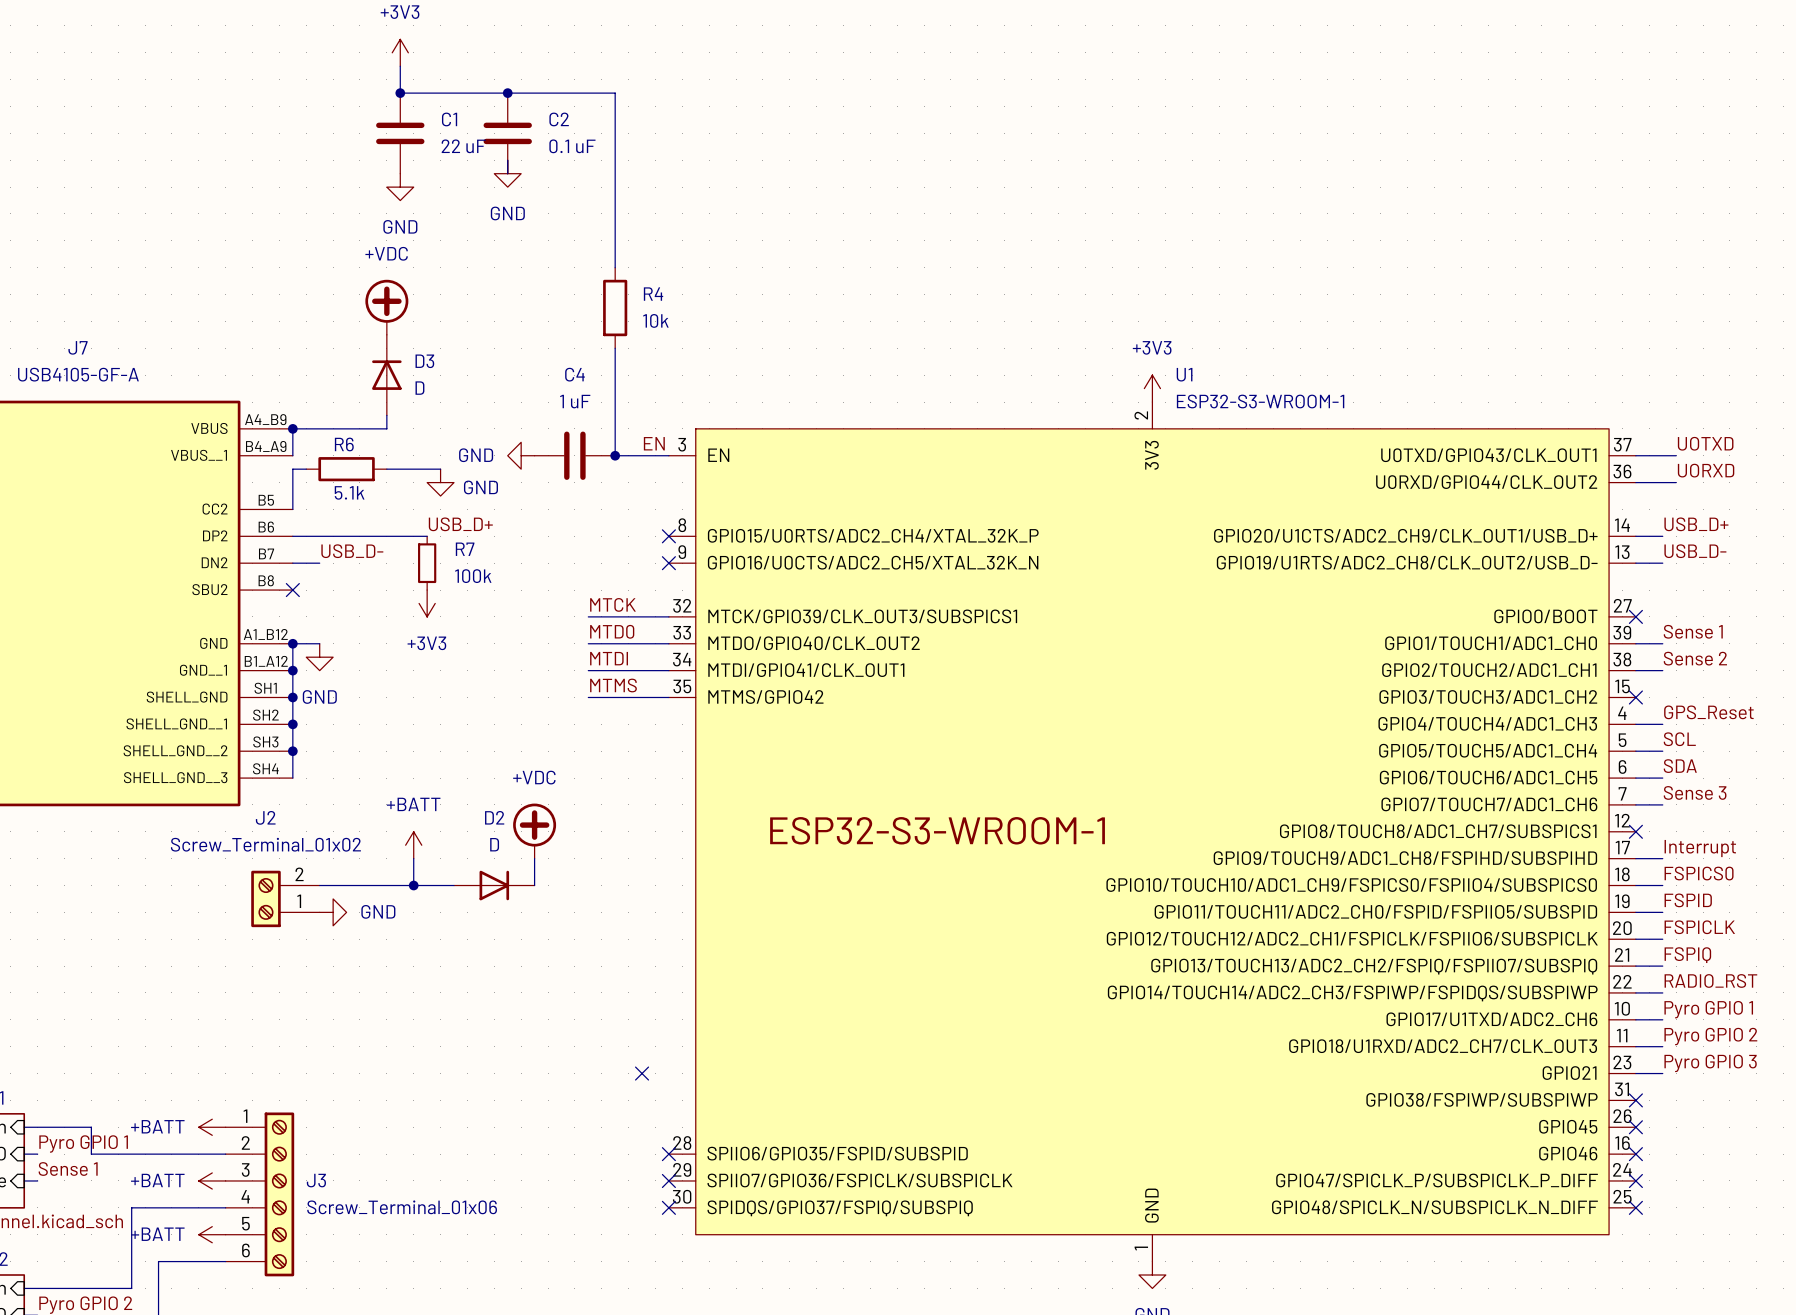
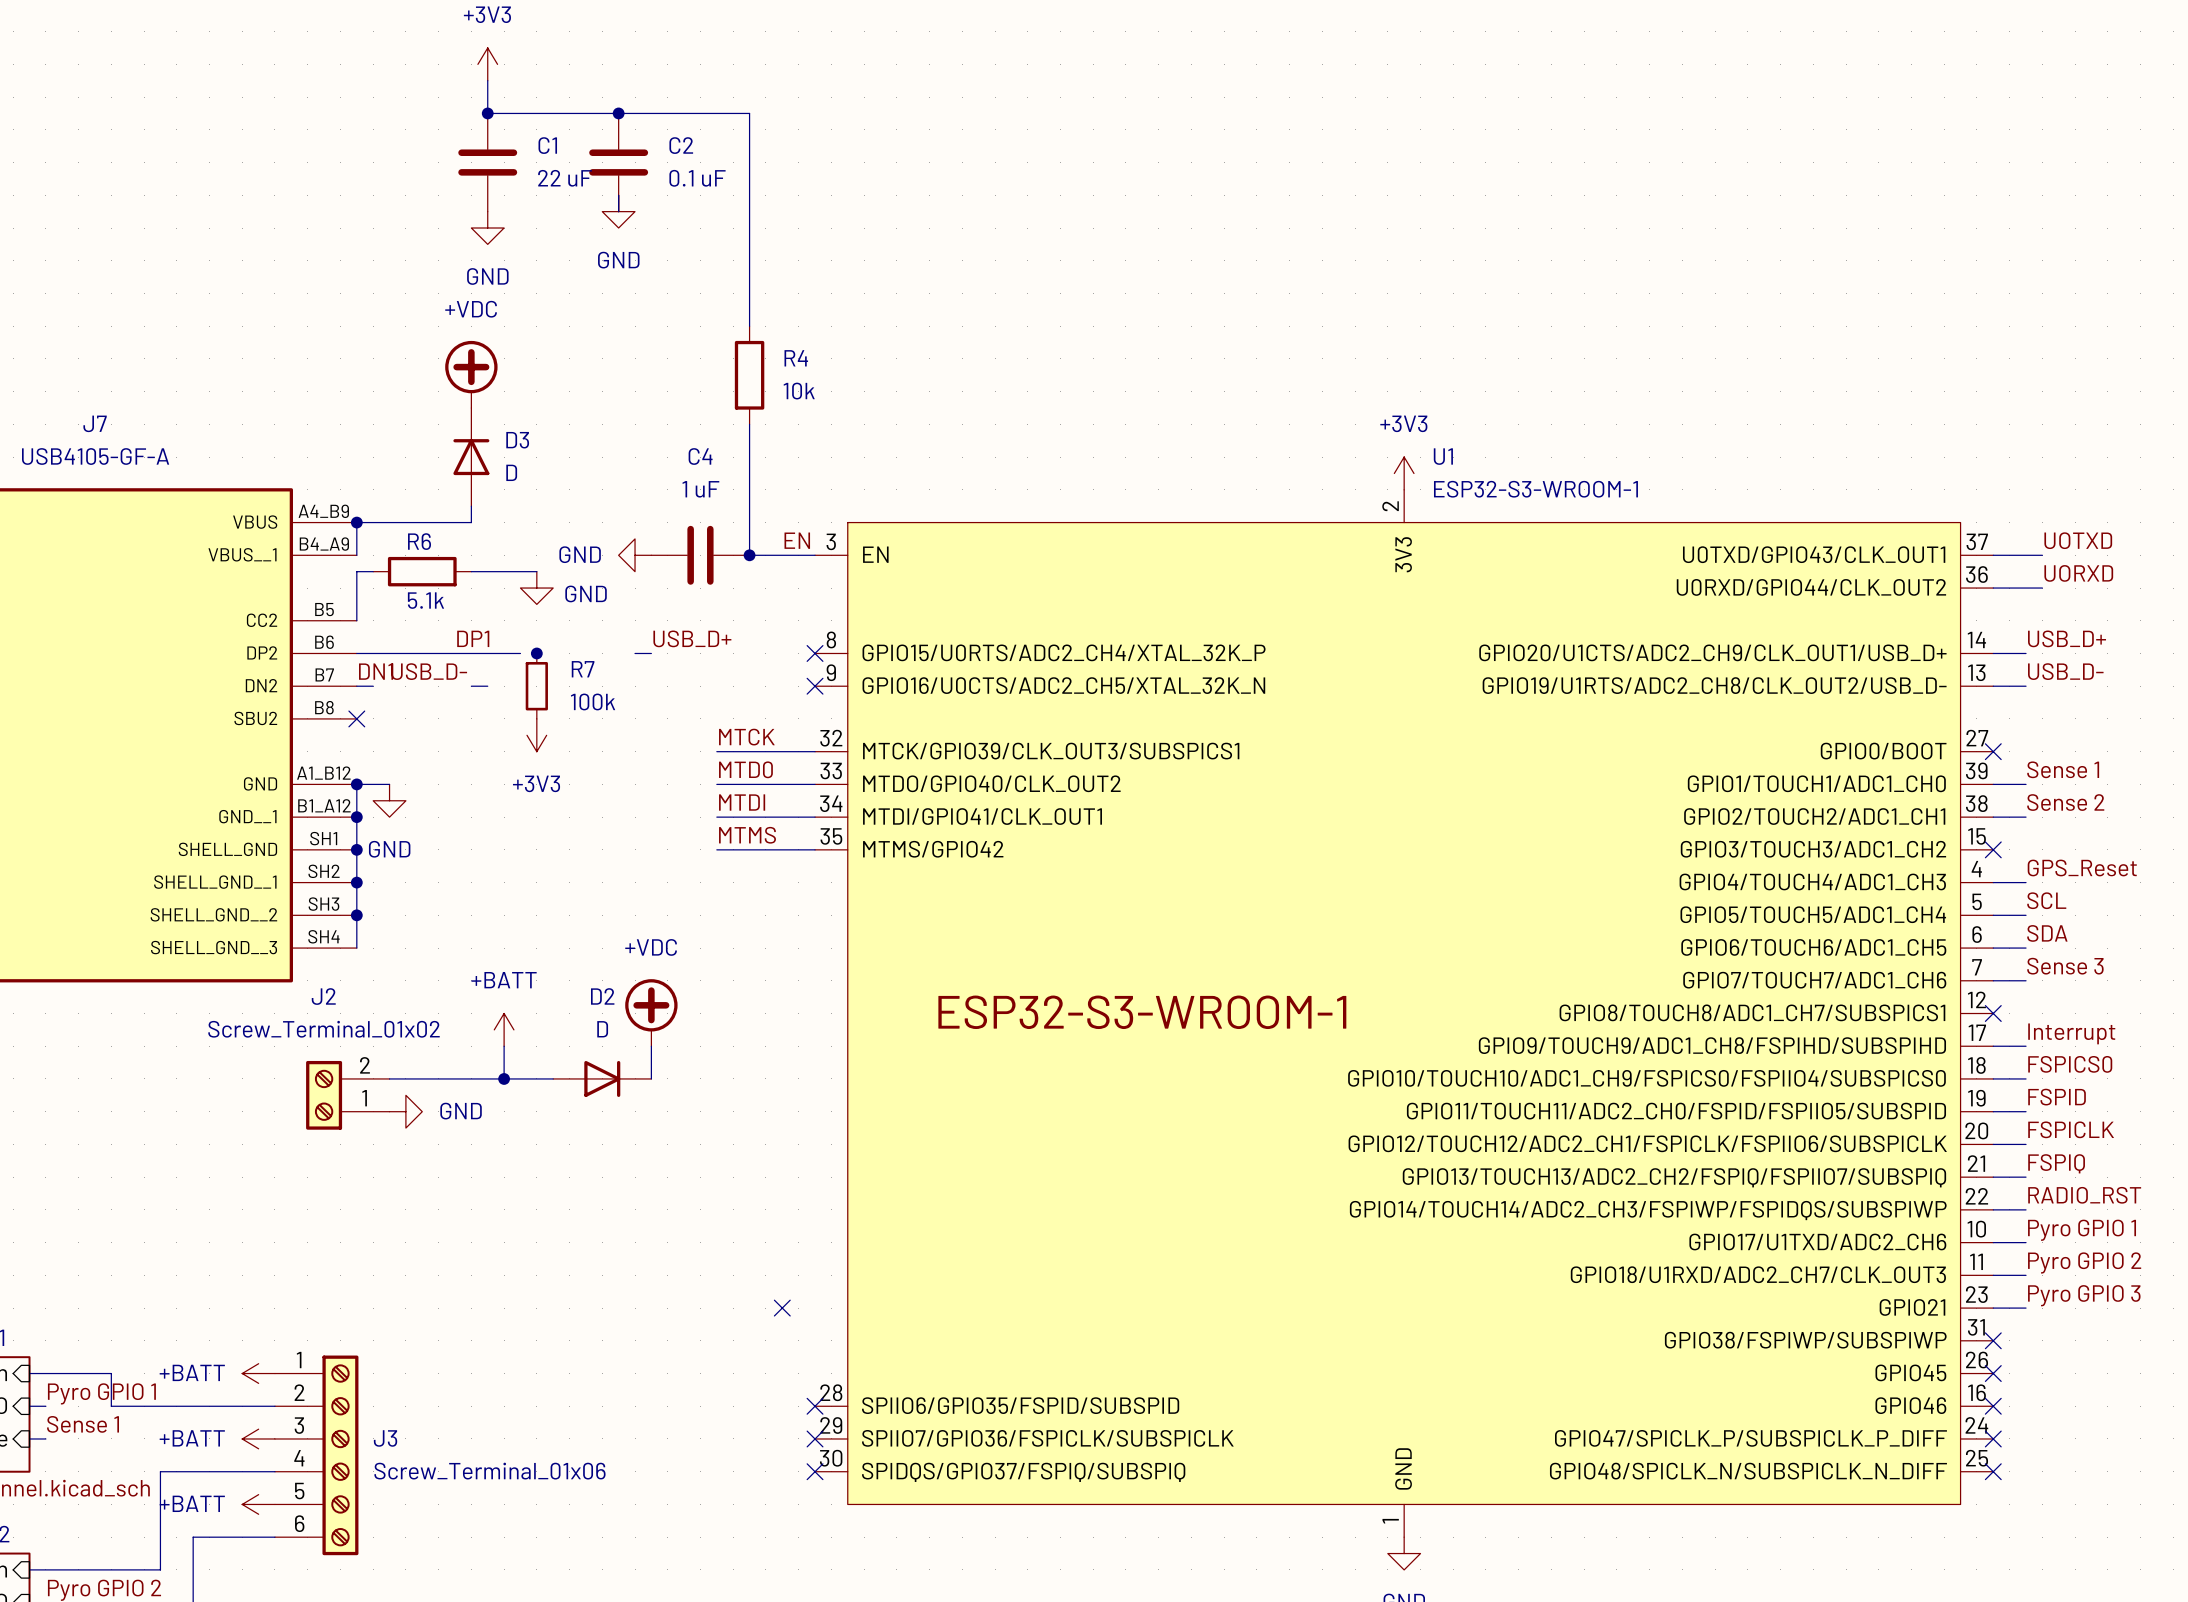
label: none -> DP1 (473, 638)
label position: USB_D+ (460, 524) -> USB_D+ (692, 638)
junction: none -> (536, 653)
wire: none -> (635, 653) (651, 653)
label: none -> DN1 (376, 671)
wire: (306, 563) (319, 563) -> (471, 686) (487, 686)
R7 position: (427, 563) -> (536, 686)
power symbol position: +3V3 (427, 603) -> +3V3 (536, 735)

